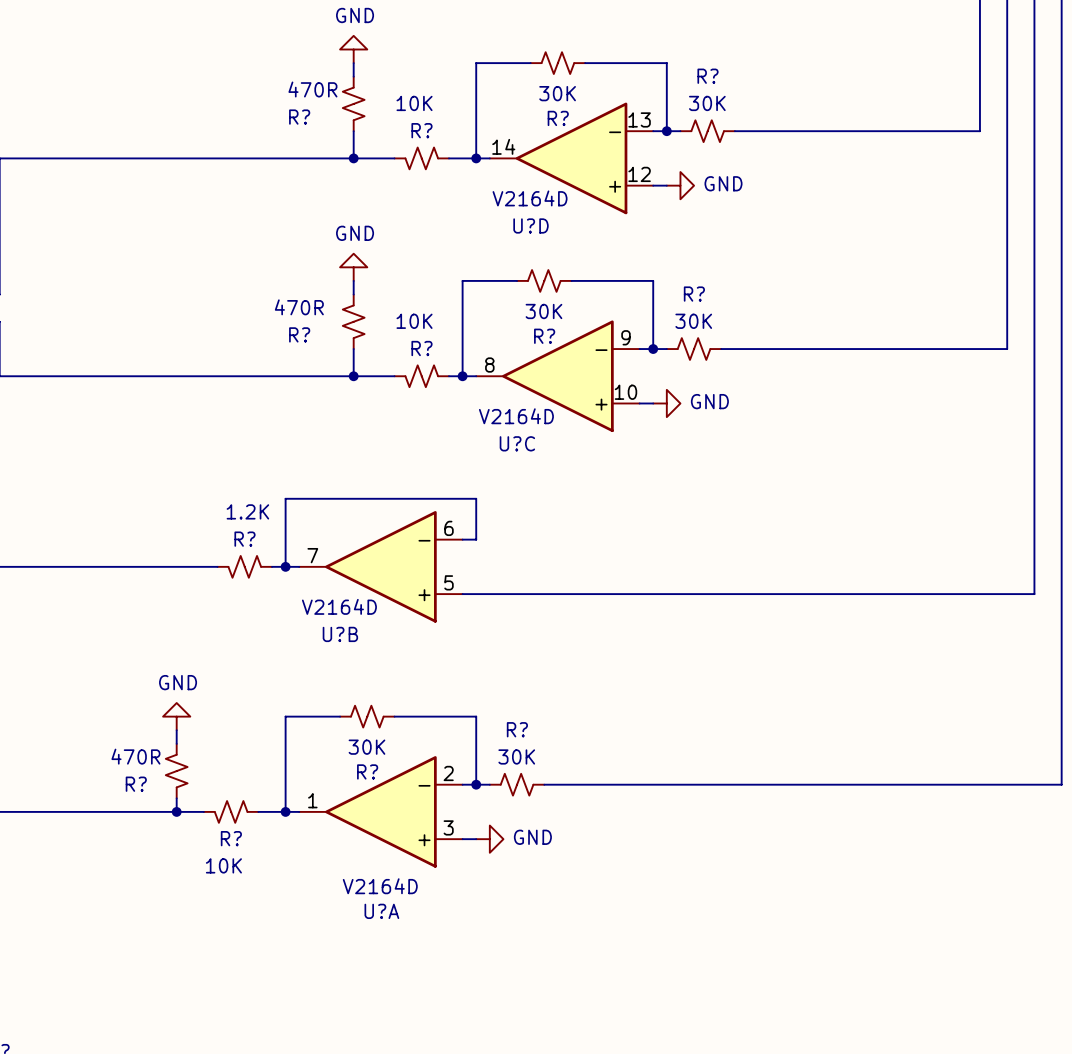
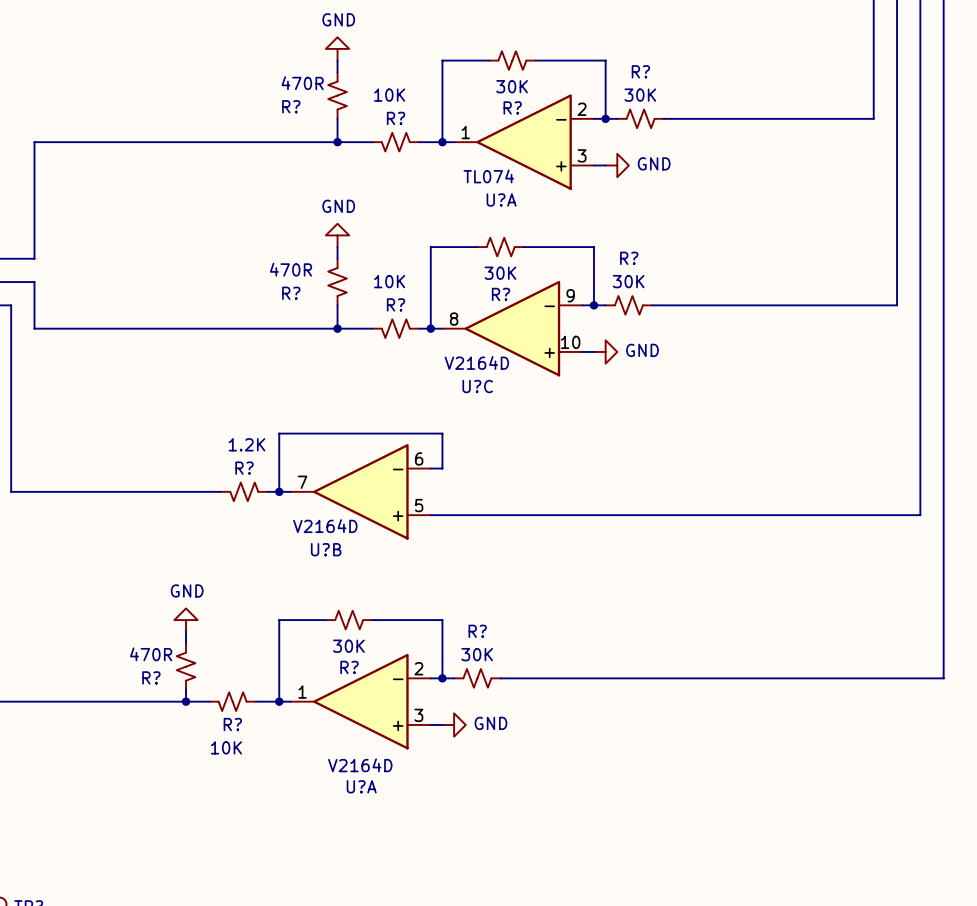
U?D pin number: 13 (639, 119) -> 2 (582, 109)
U?D pin number: 14 (503, 146) -> 1 (465, 132)
U?D pin number: 12 (639, 174) -> 3 (582, 155)
U?D value: V2164D (530, 198) -> TL074 (488, 176)
U?D name: U?D (531, 225) -> U?A (501, 200)

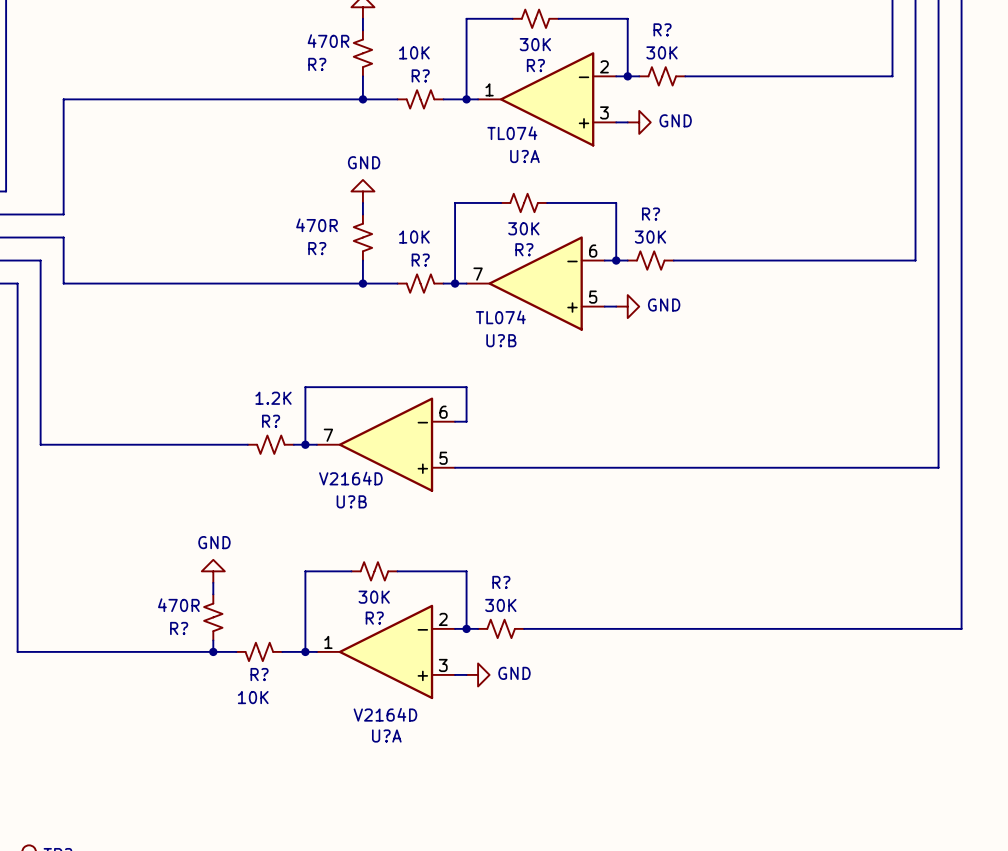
U?C pin number: 9 (570, 295) -> 6 (593, 251)
U?C pin number: 8 (454, 319) -> 7 (478, 274)
U?C pin number: 10 (570, 342) -> 5 (593, 297)
U?C value: V2164D (476, 362) -> TL074 (500, 317)
U?C name: U?C (477, 386) -> U?B (501, 340)

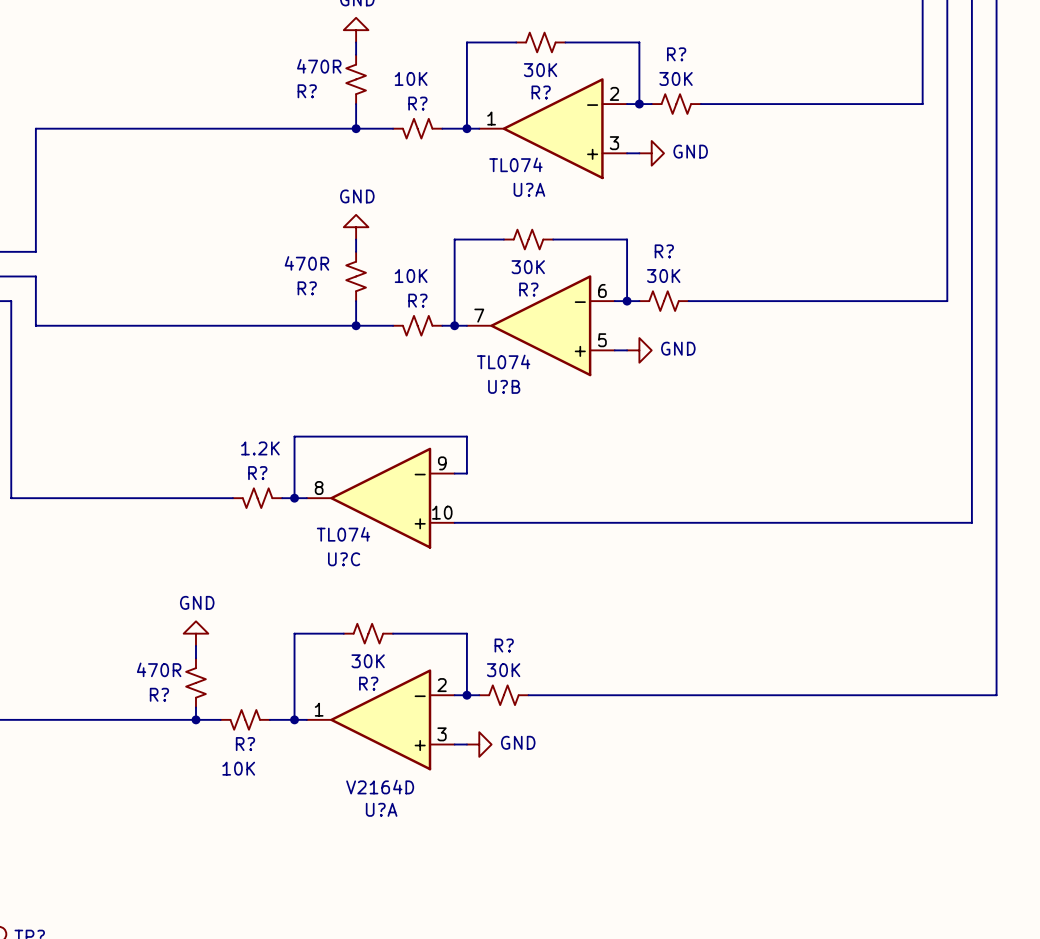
U?B pin number: 6 (443, 412) -> 9 (442, 463)
U?B pin number: 7 (328, 435) -> 8 (319, 488)
U?B pin number: 5 (443, 458) -> 10 (442, 512)
U?B value: V2164D (350, 478) -> TL074 (343, 534)
U?B name: U?B (351, 501) -> U?C (344, 559)

